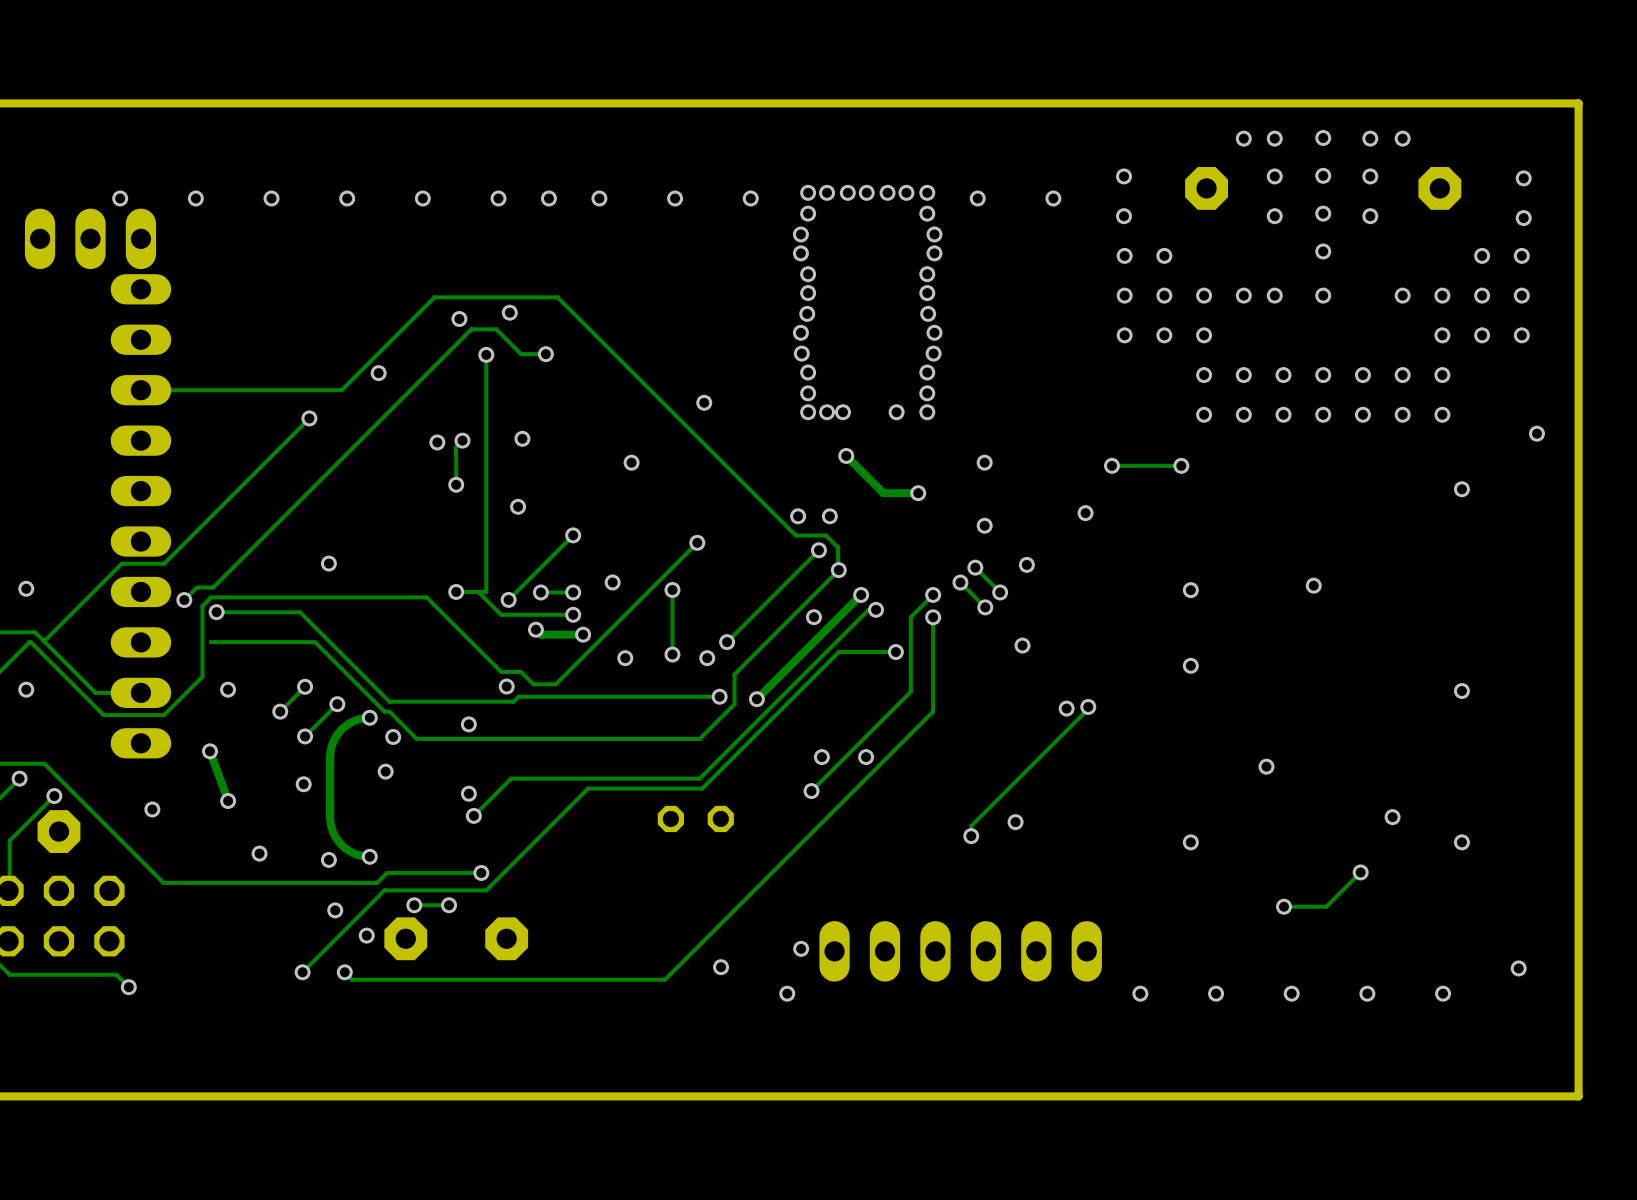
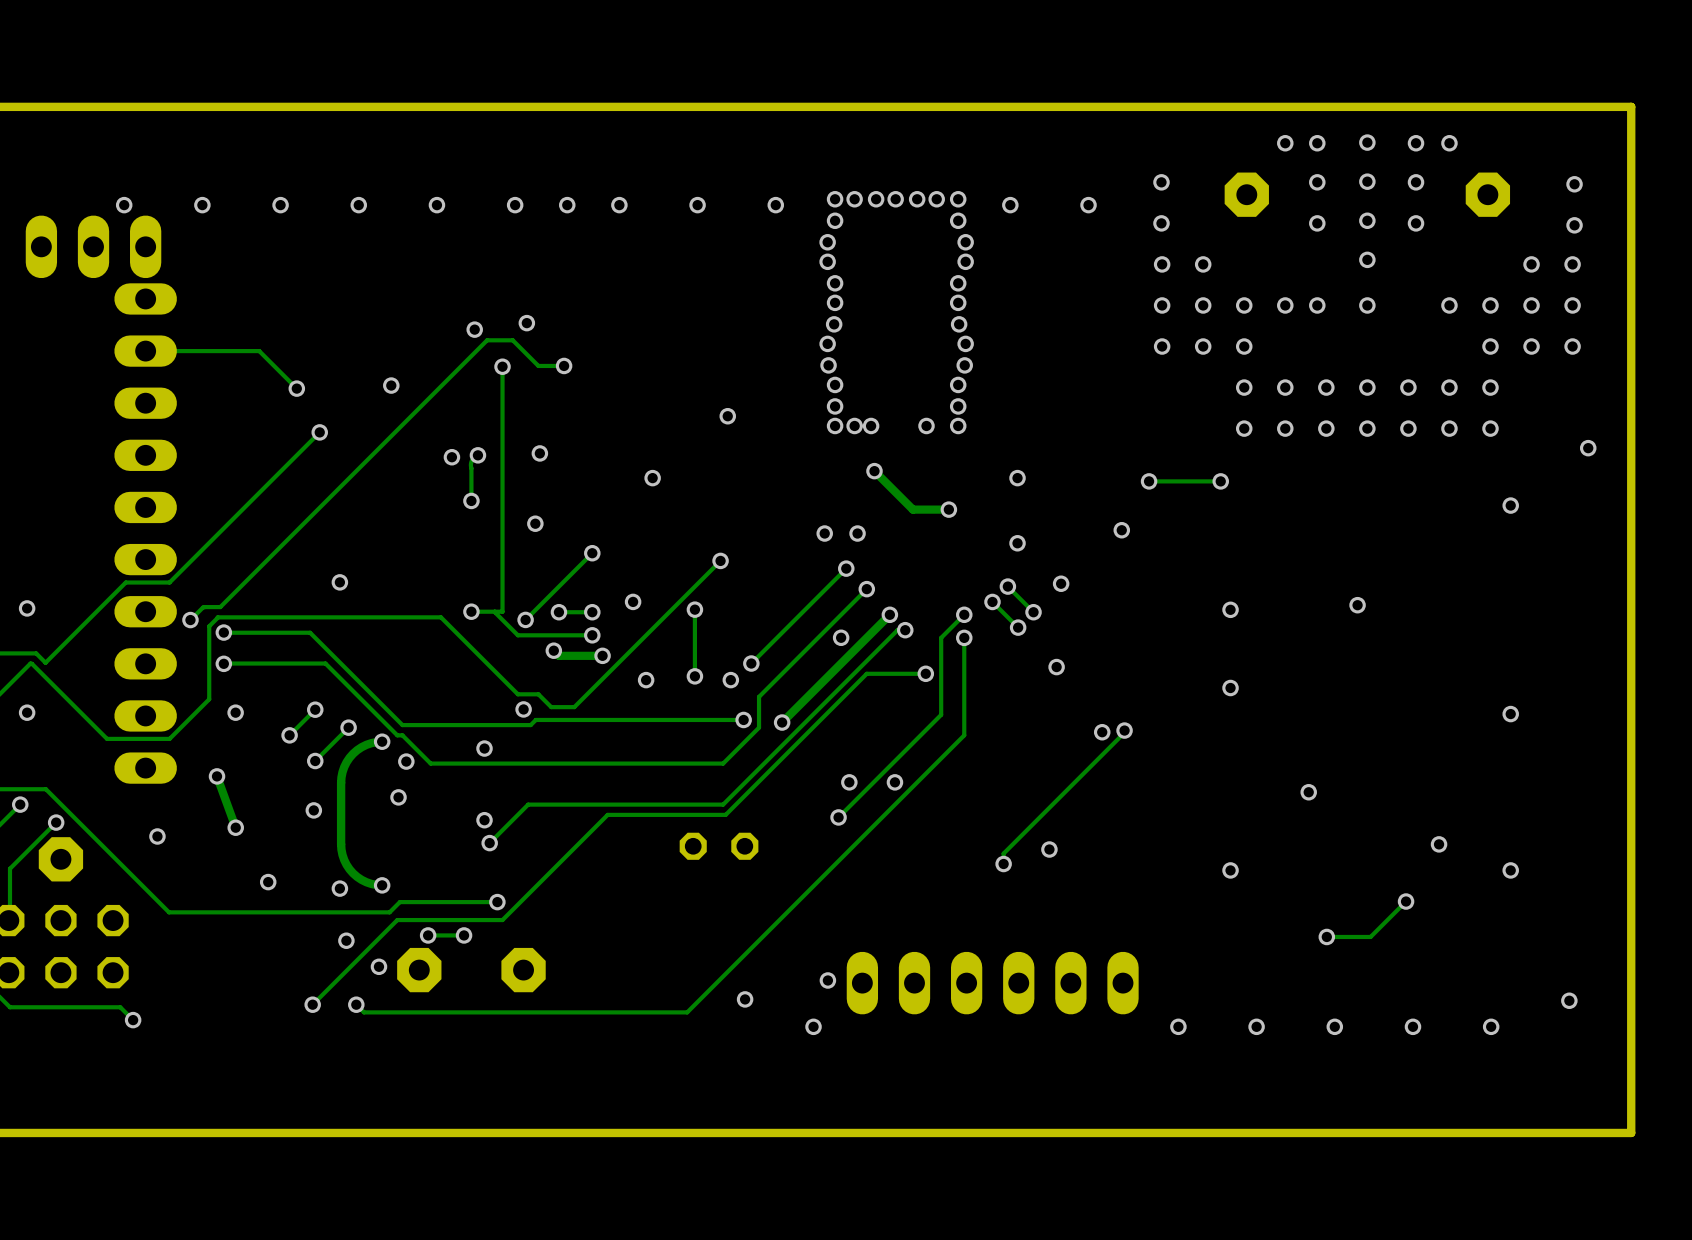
track: none -> (145, 351) (259, 351) (296, 388)
via: none -> (296, 388)
track: (140, 390) (341, 390) (434, 297) (557, 297) (795, 535) (825, 535) (838, 547) (838, 570) -> none
track: (44, 641) (95, 692) (140, 692) -> none
via: none -> (223, 663)

